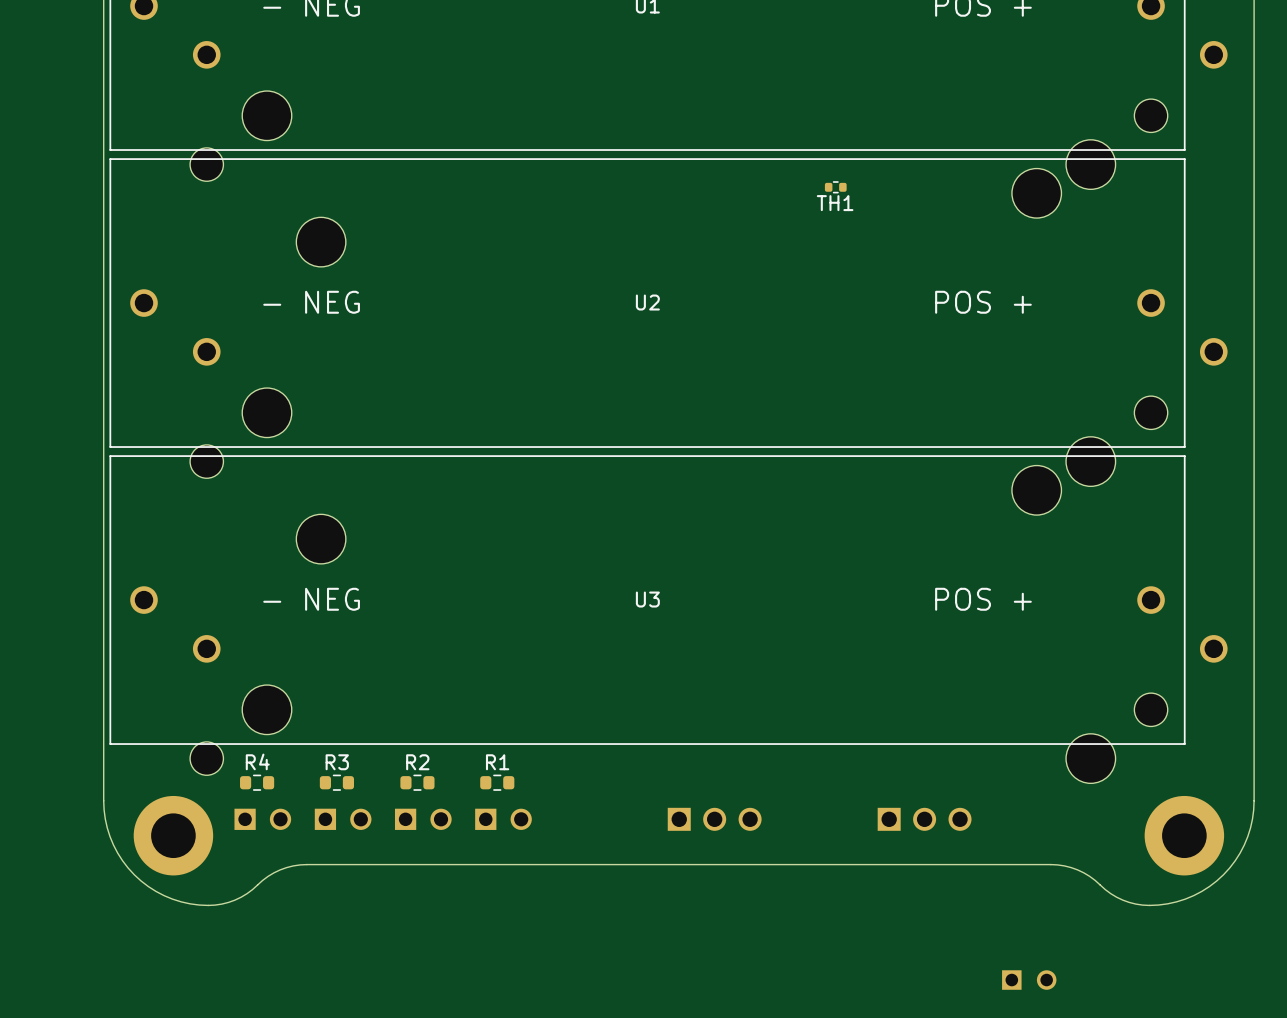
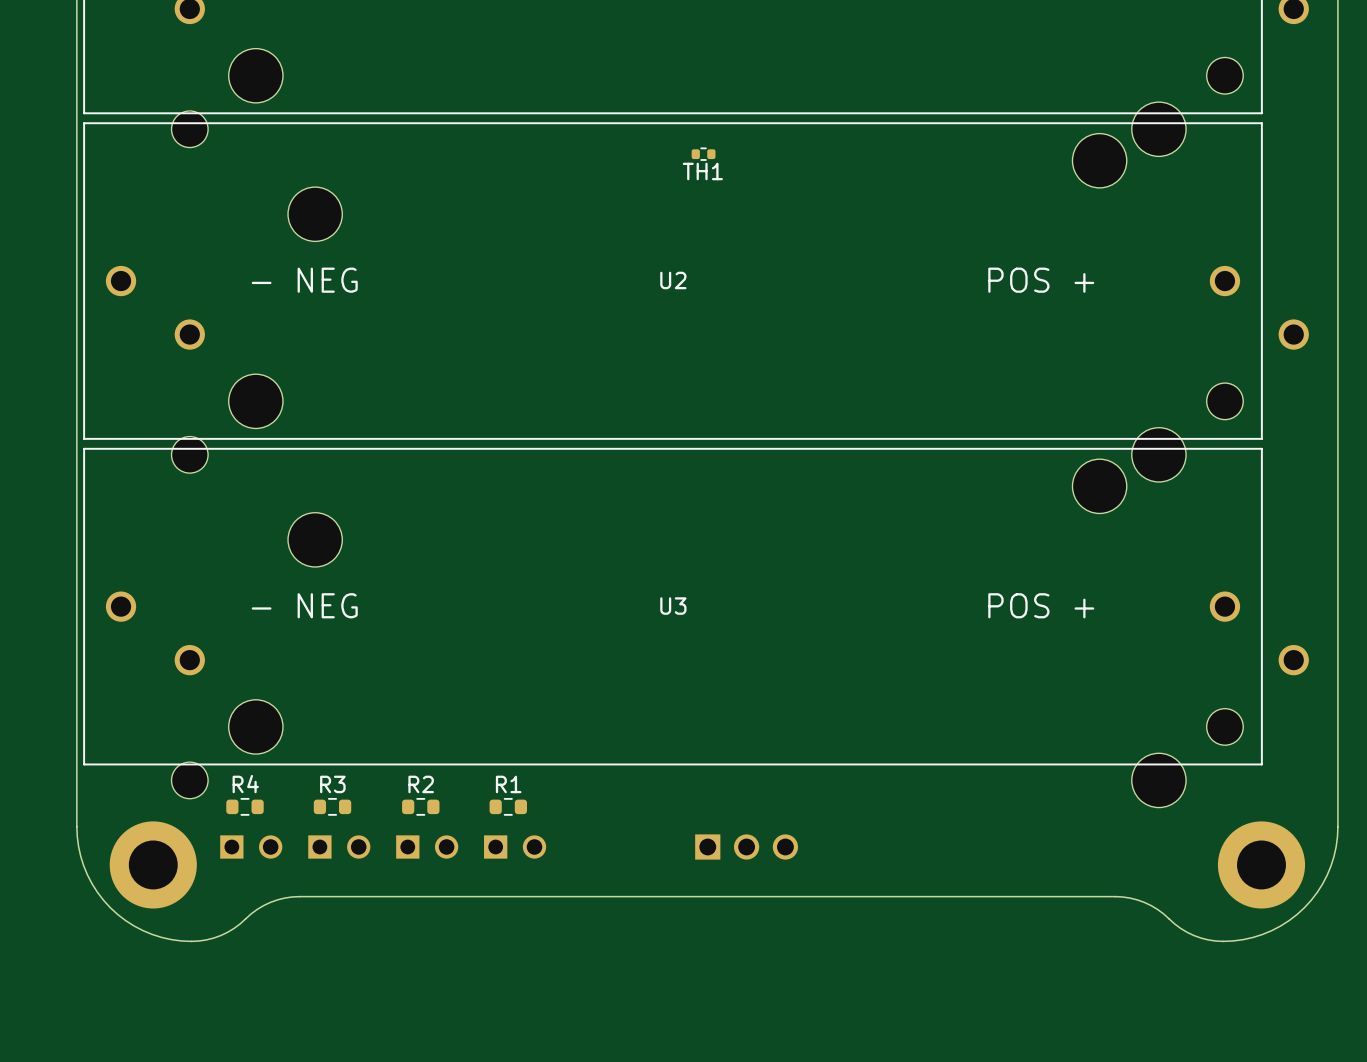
TH1 position: (835, 187) -> (703, 154)
part: (924, 819) -> none
part: (1029, 980) -> none

